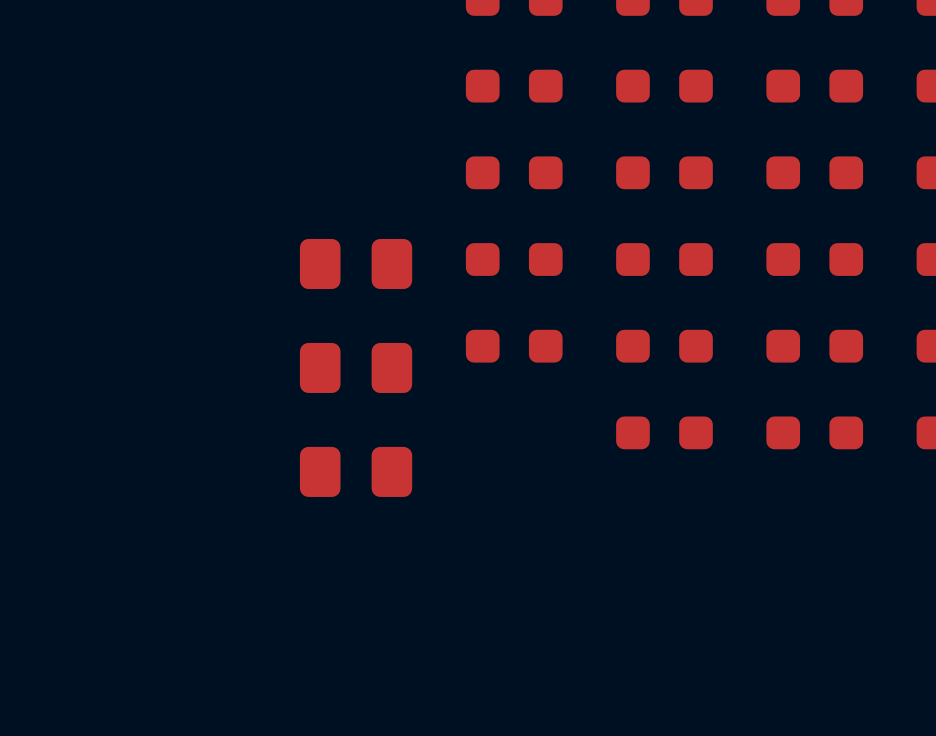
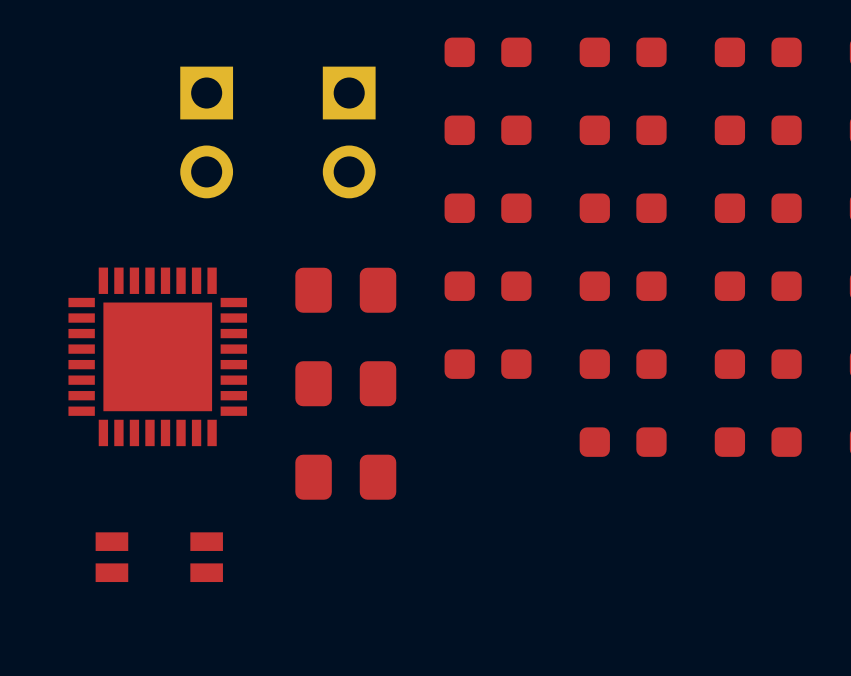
part: none -> (206, 132)
part: none -> (349, 132)
part: none -> (157, 356)
part: none -> (159, 557)

